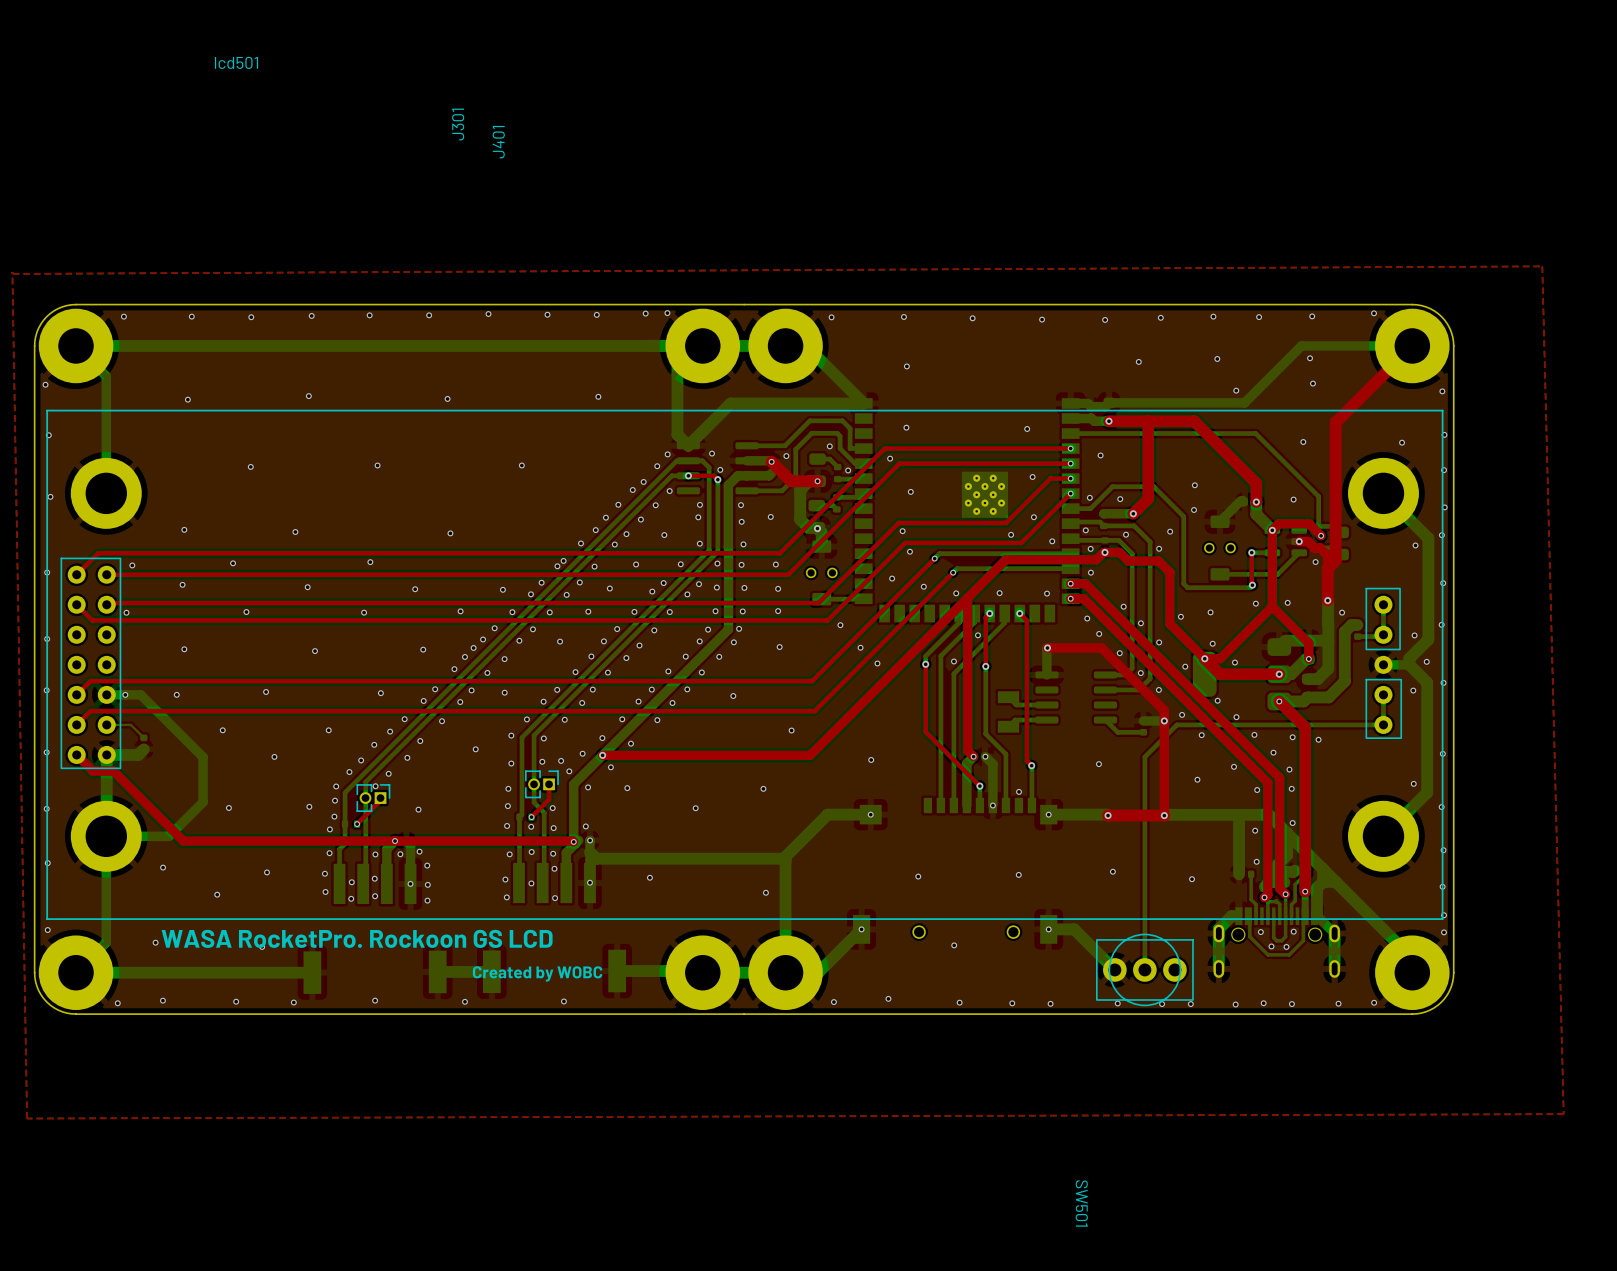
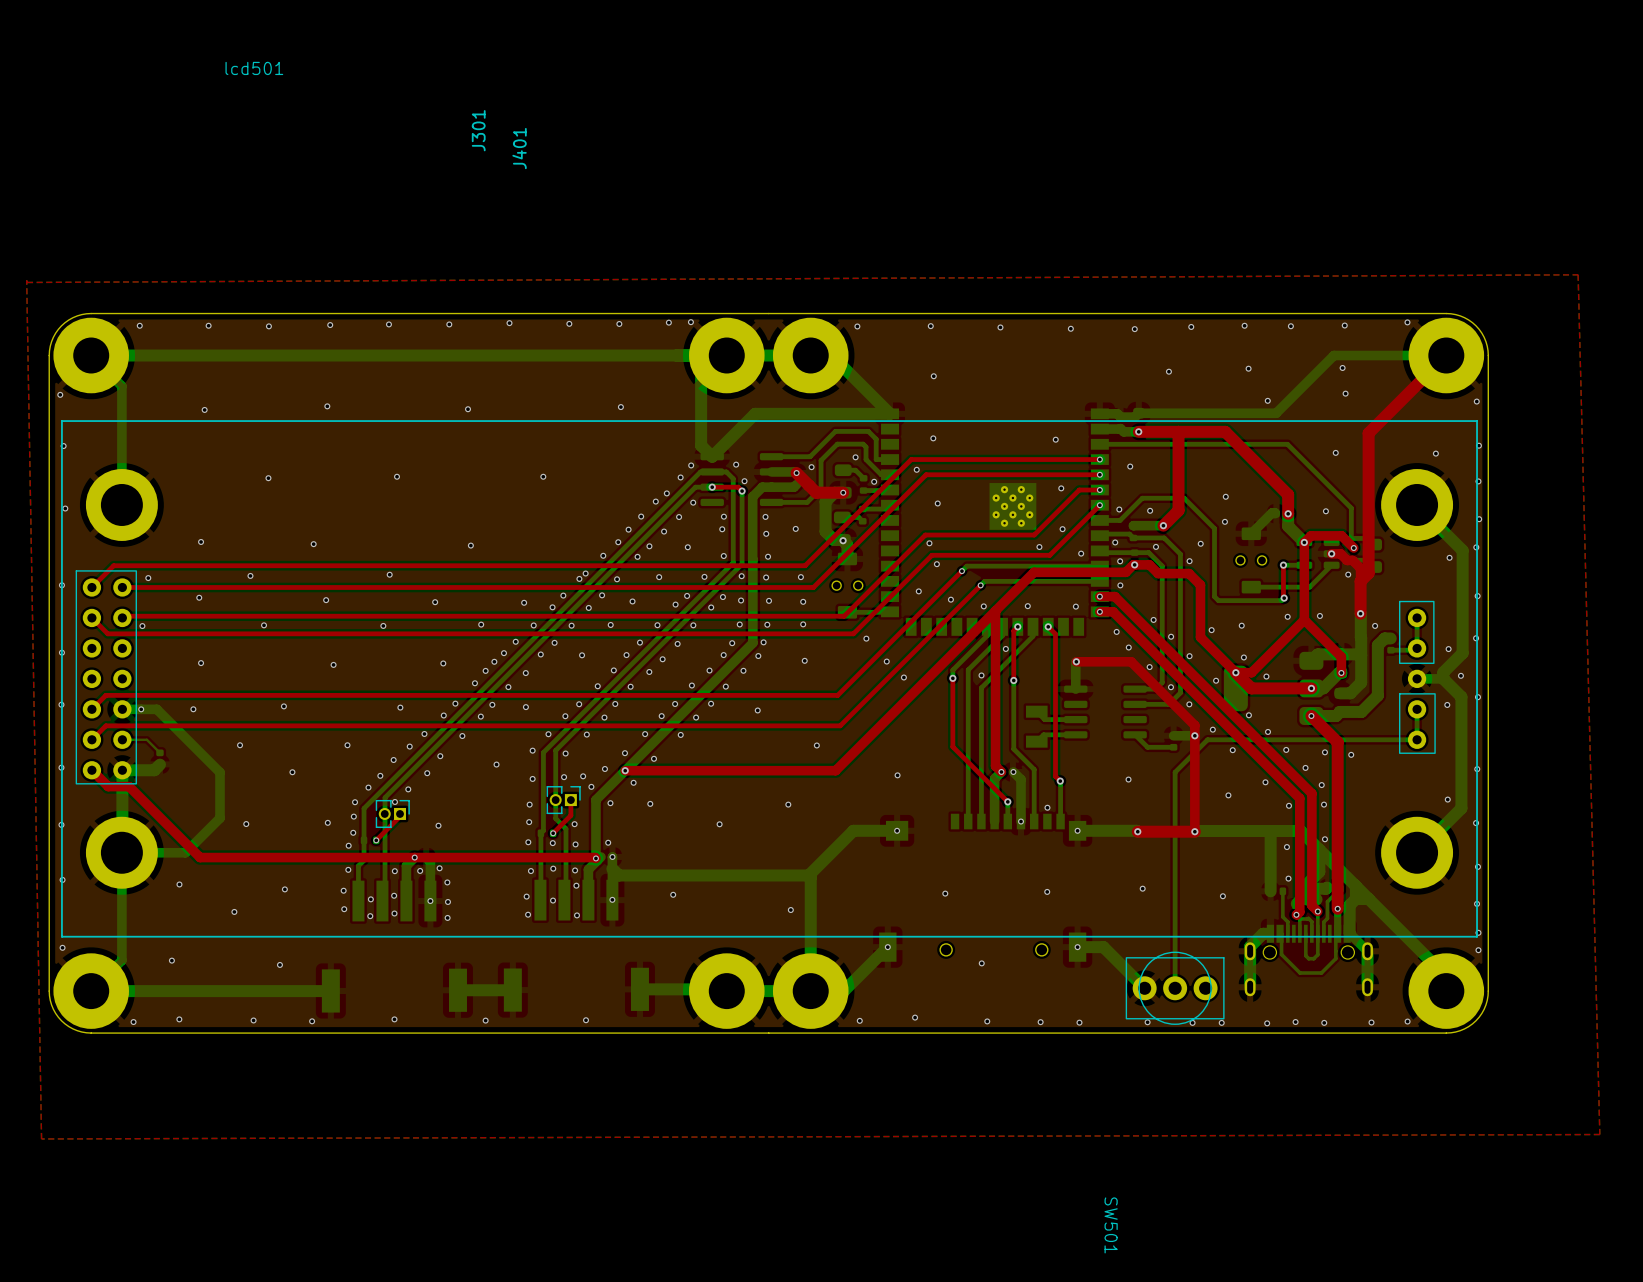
via: (1293, 931) -> none
via: (1260, 932) -> none
text: WASA RocketPro. Rockoon GS LCD (357, 938) -> none
via: (1271, 946) -> none
via: (1286, 946) -> none
text: Created by WOBC (537, 973) -> none

